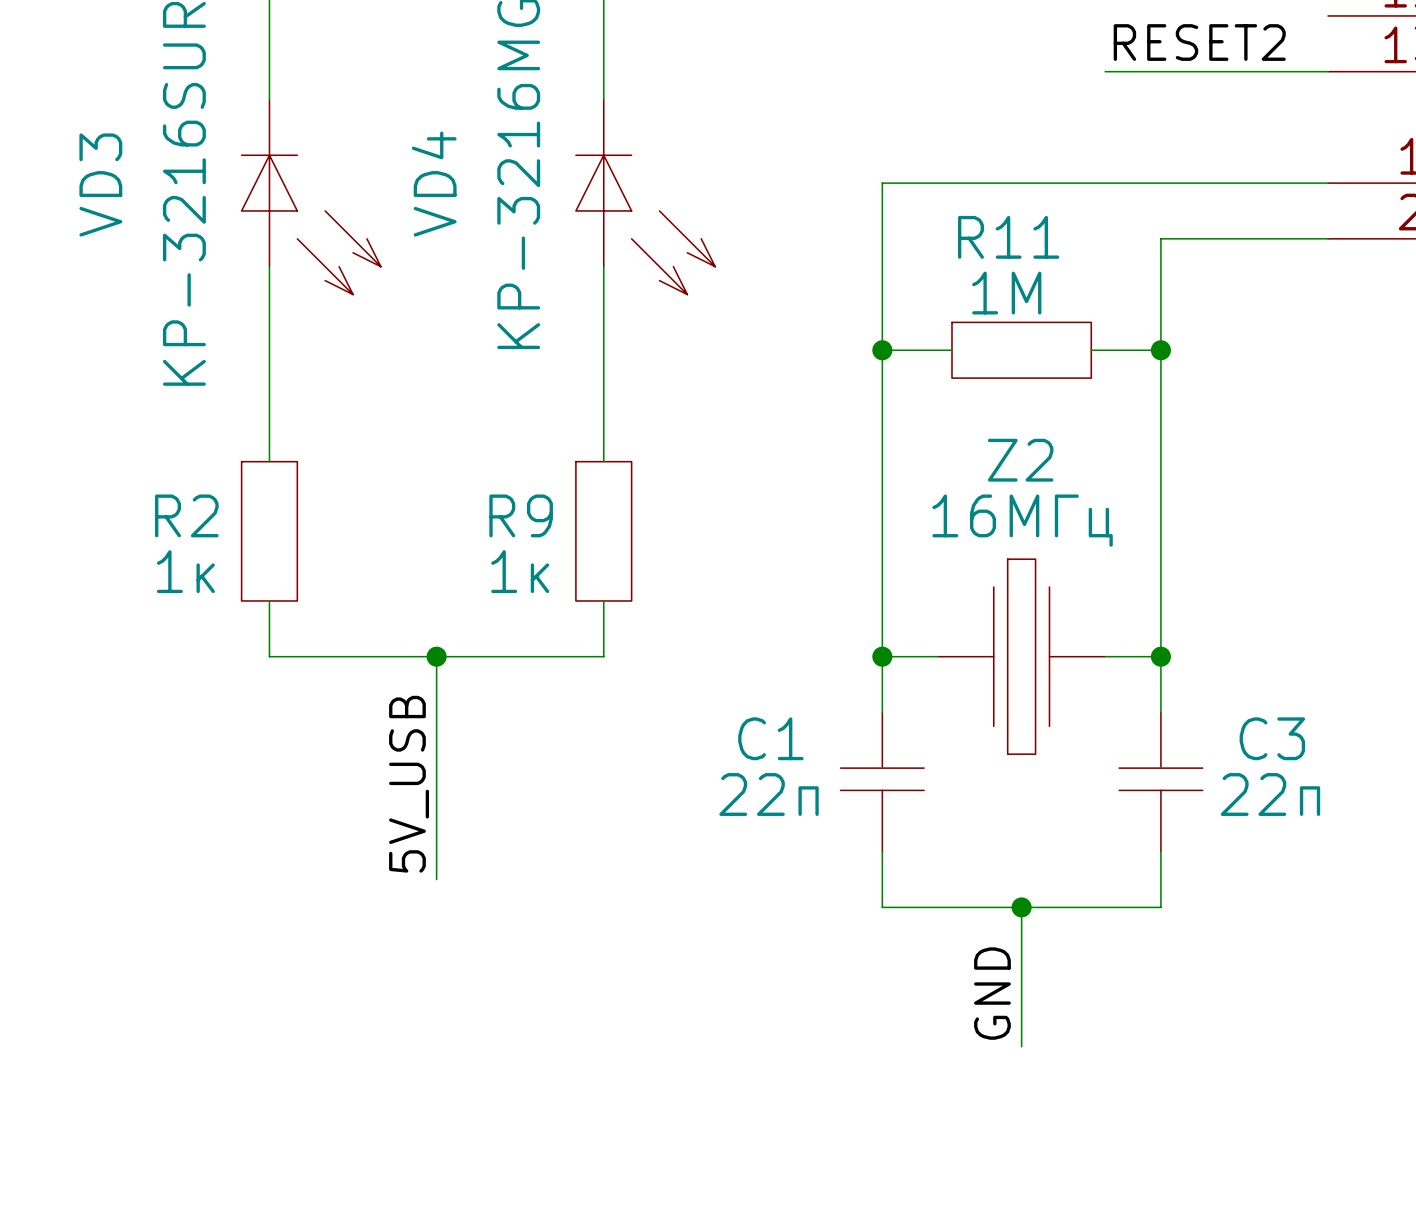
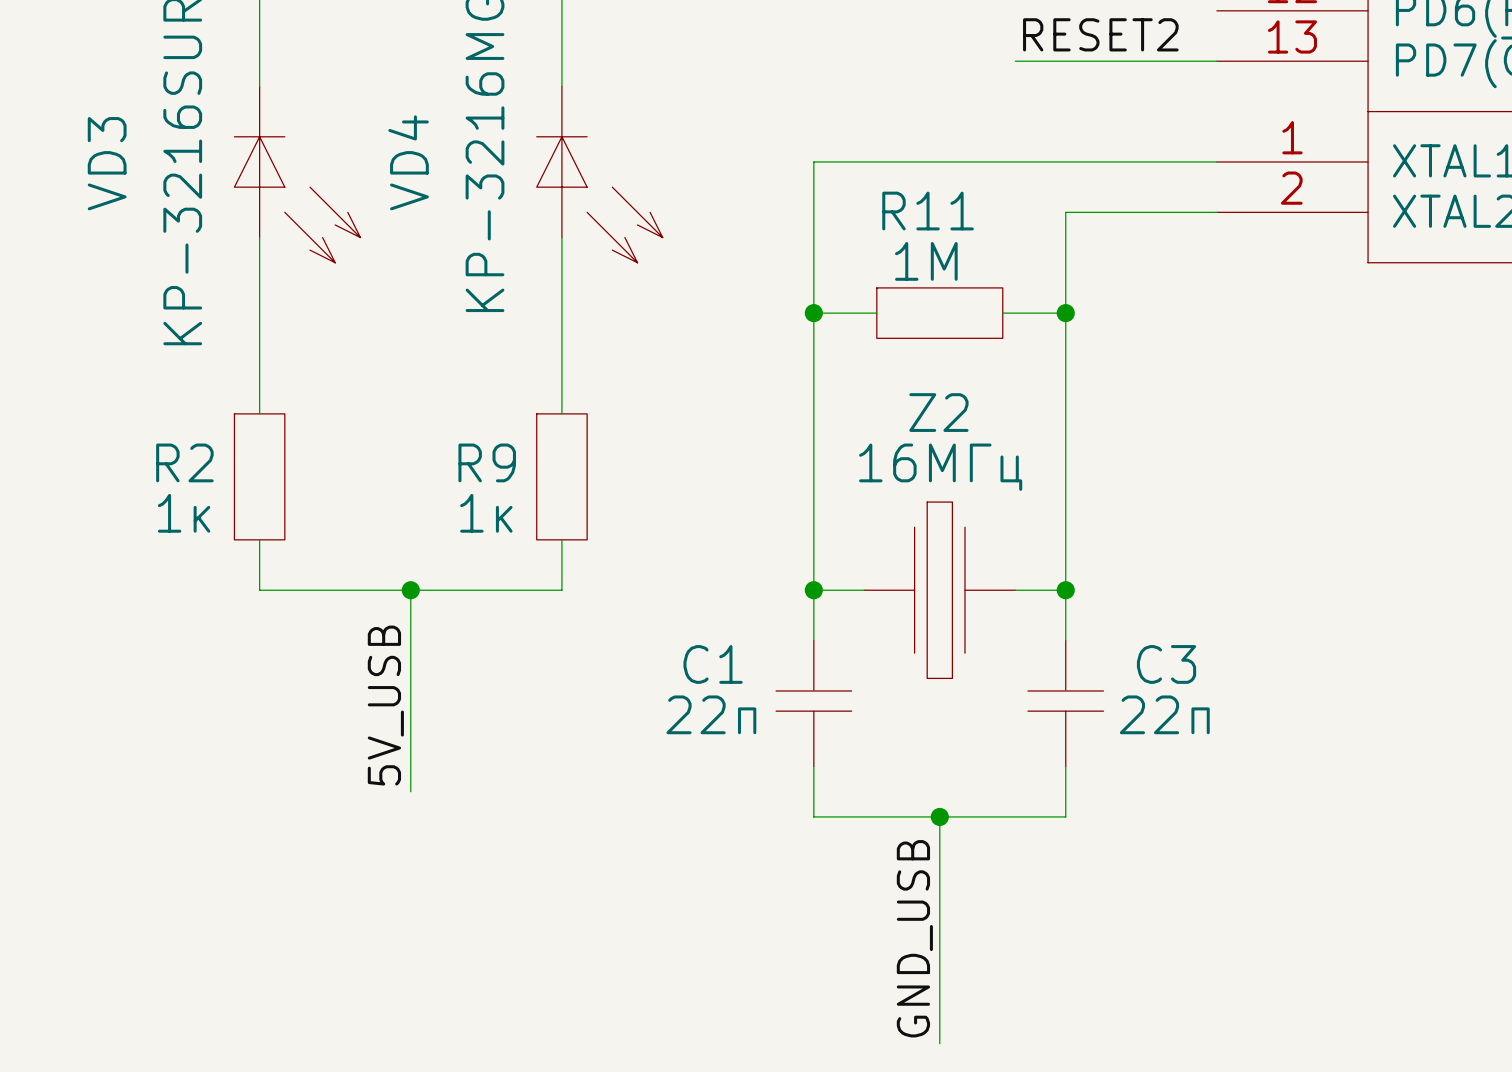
label: GND (992, 993) -> none
label: none -> GND_USB (914, 938)
wire: none -> (939, 942) (939, 1043)

